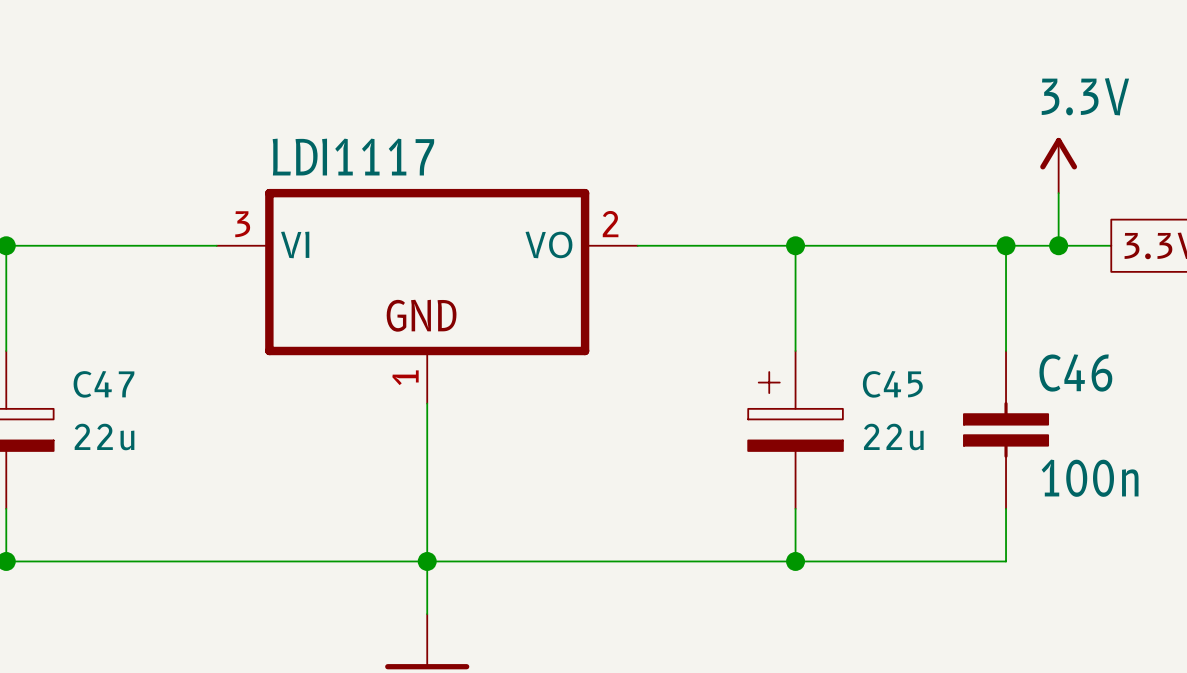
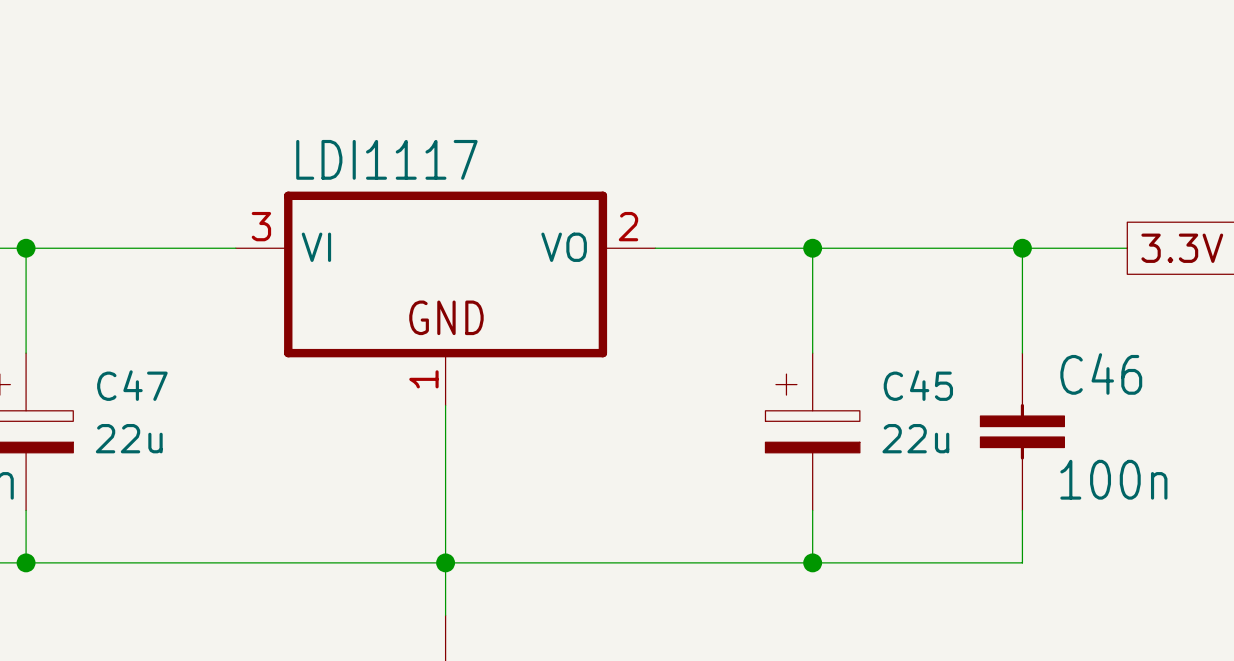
power symbol: 3.3V (1058, 165) -> none
wire: (1058, 193) (1058, 245) -> none
junction: (1058, 245) -> none

